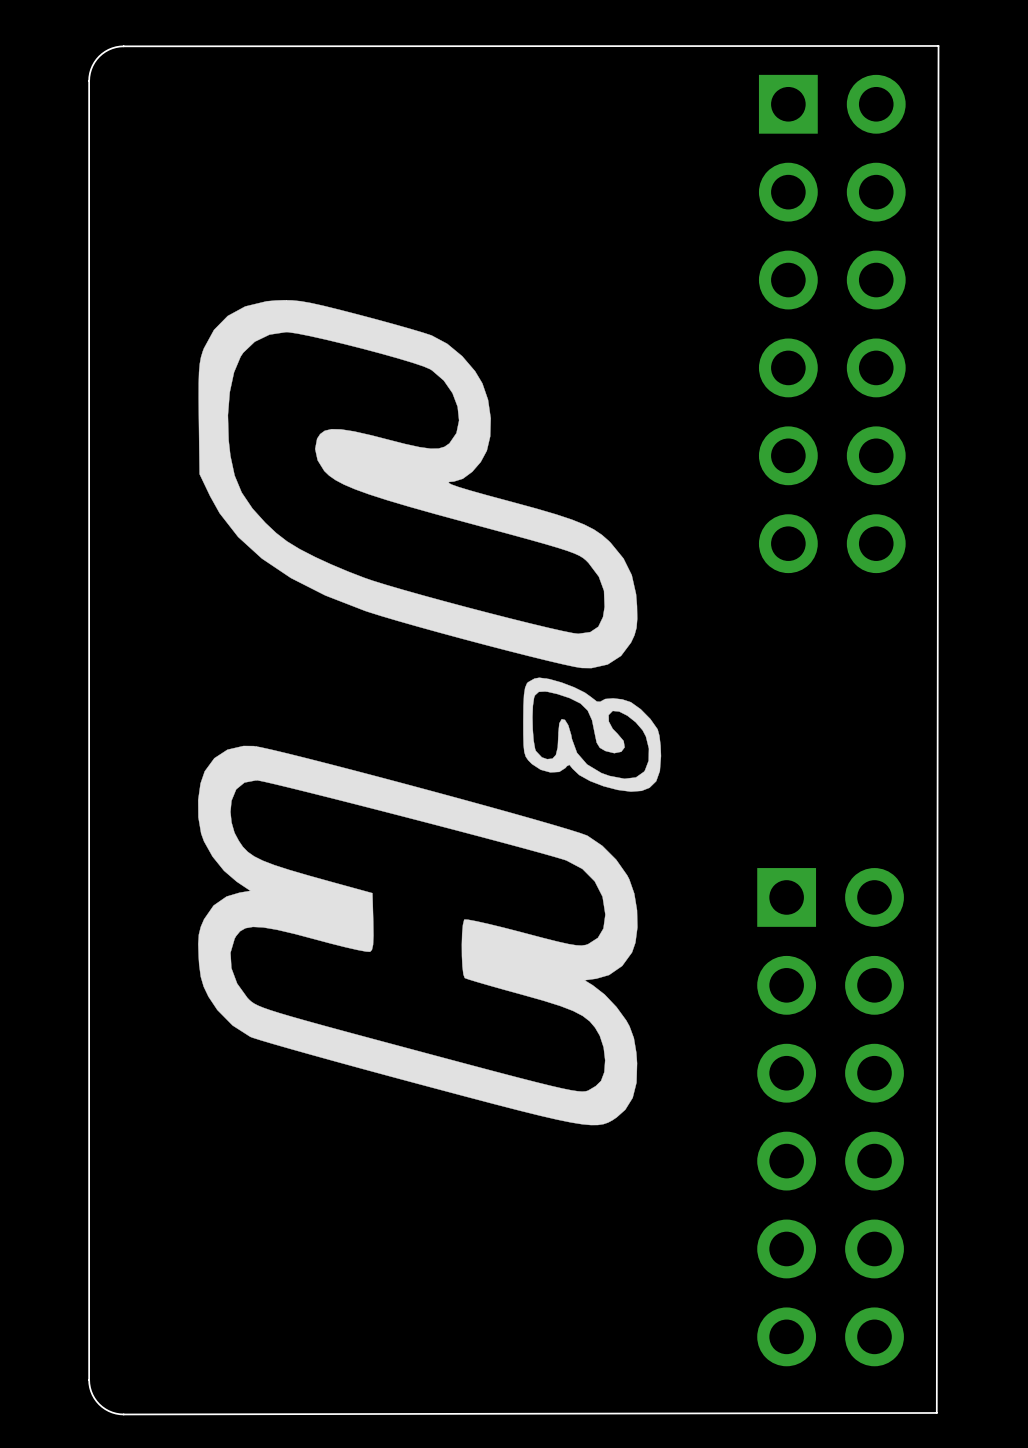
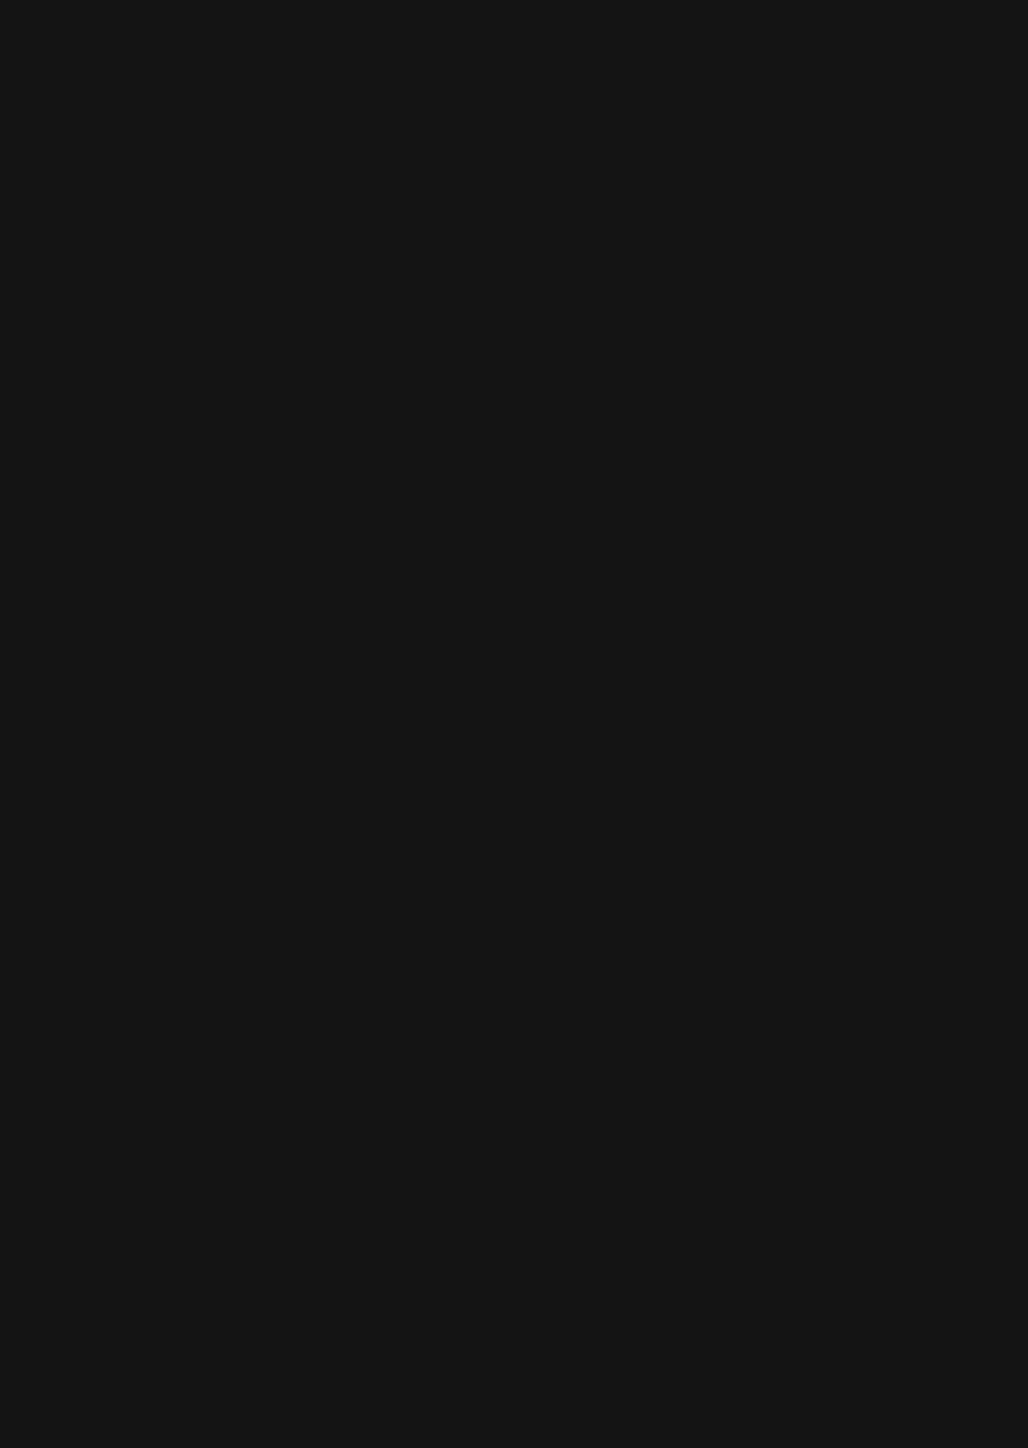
board edge: (938, 45) (123, 46) (105, 51) (94, 62) (89, 80) (89, 1379) (94, 1398) (105, 1409) (123, 1414) (936, 1412) (938, 45) -> none
drawing: [198, 300, 662, 1126] -> none
part: (832, 323) -> none
part: (830, 1117) -> none

